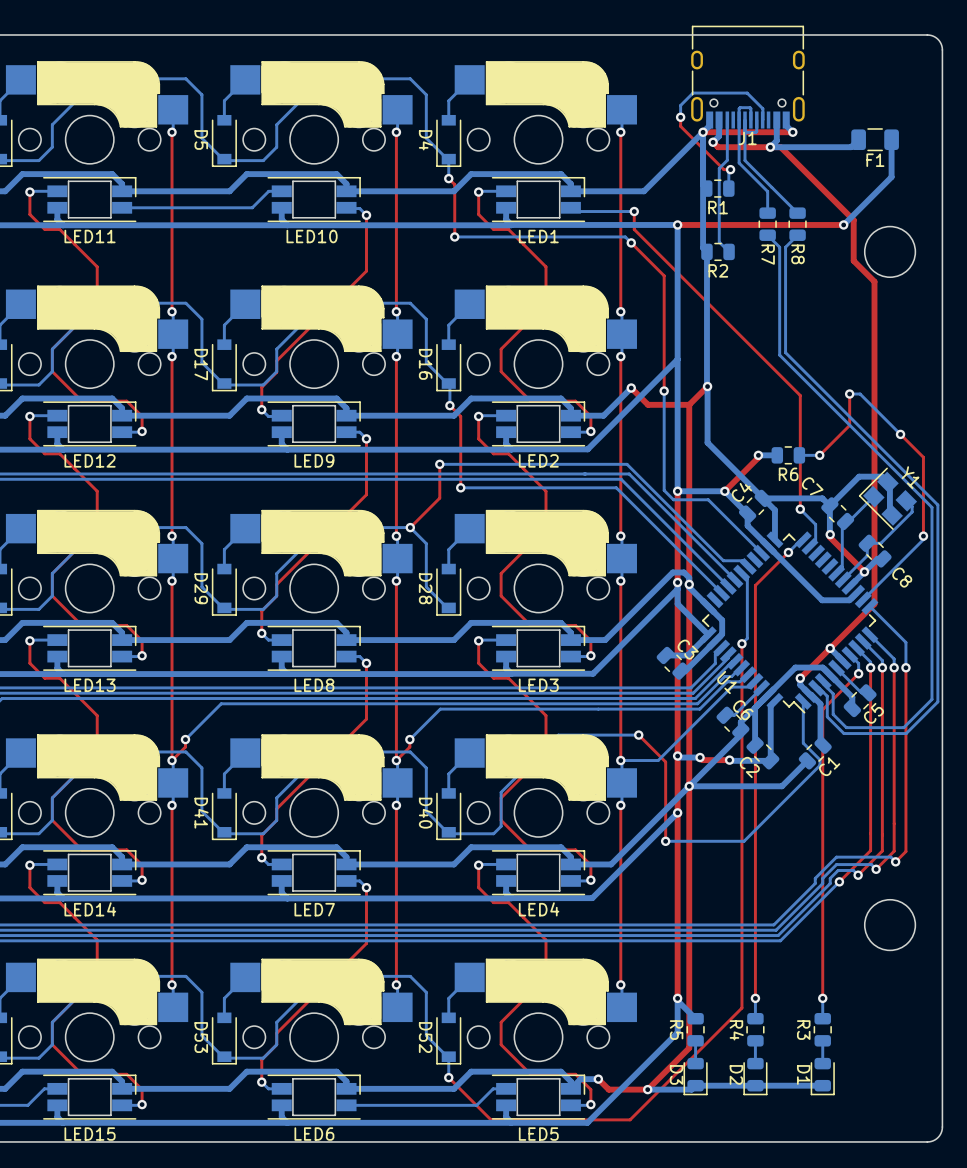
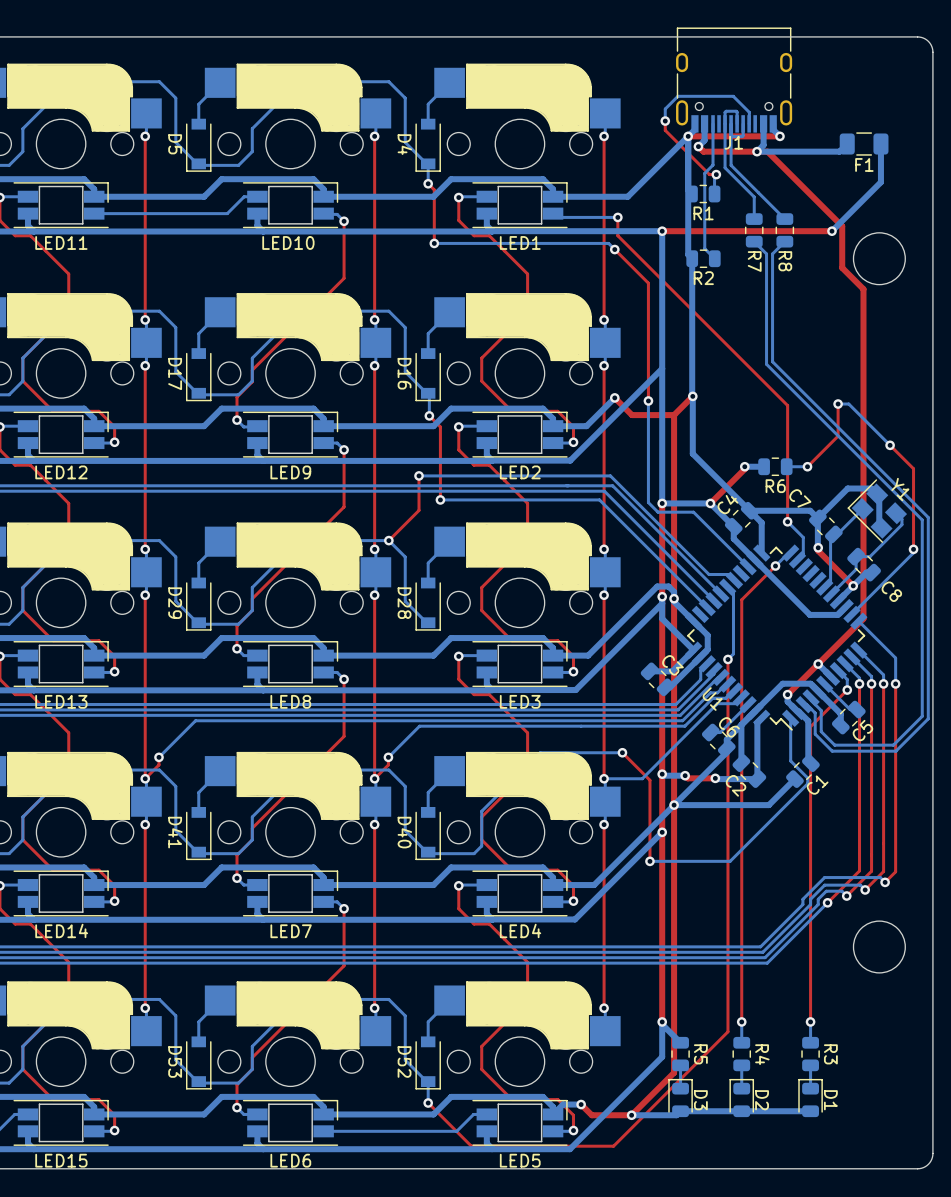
R5 name position: R5 (676, 1030) -> R5 (700, 1054)
R4 name position: R4 (736, 1030) -> R4 (762, 1054)
R3 name position: R3 (803, 1030) -> R3 (830, 1054)
D3 rotation: 0° (695, 1076) -> 180° (680, 1098)
D2 rotation: 0° (755, 1076) -> 180° (741, 1098)
D1 rotation: 0° (822, 1076) -> 180° (810, 1098)

